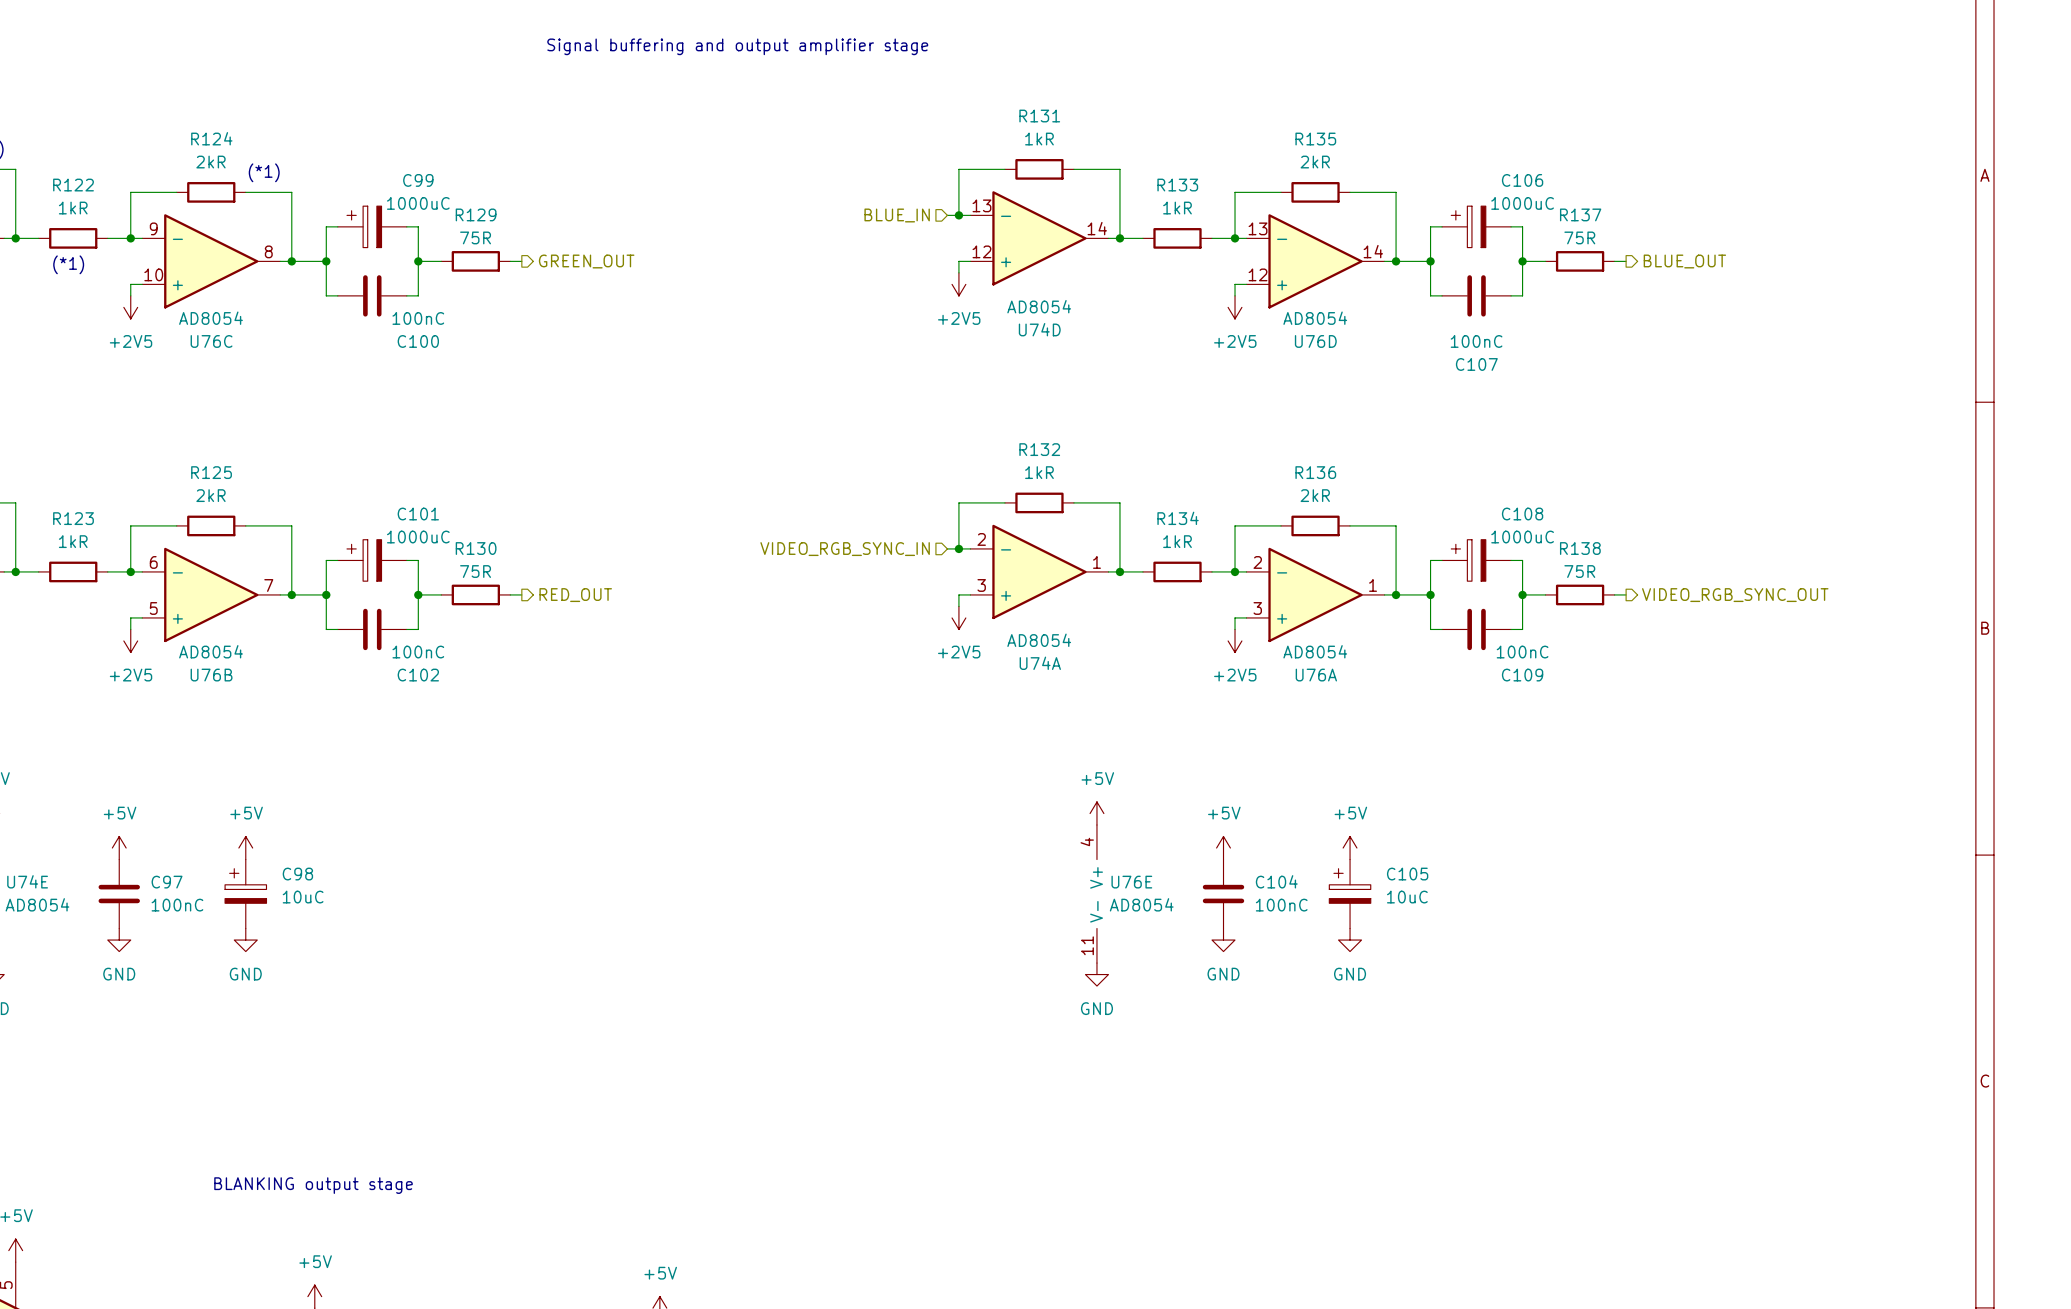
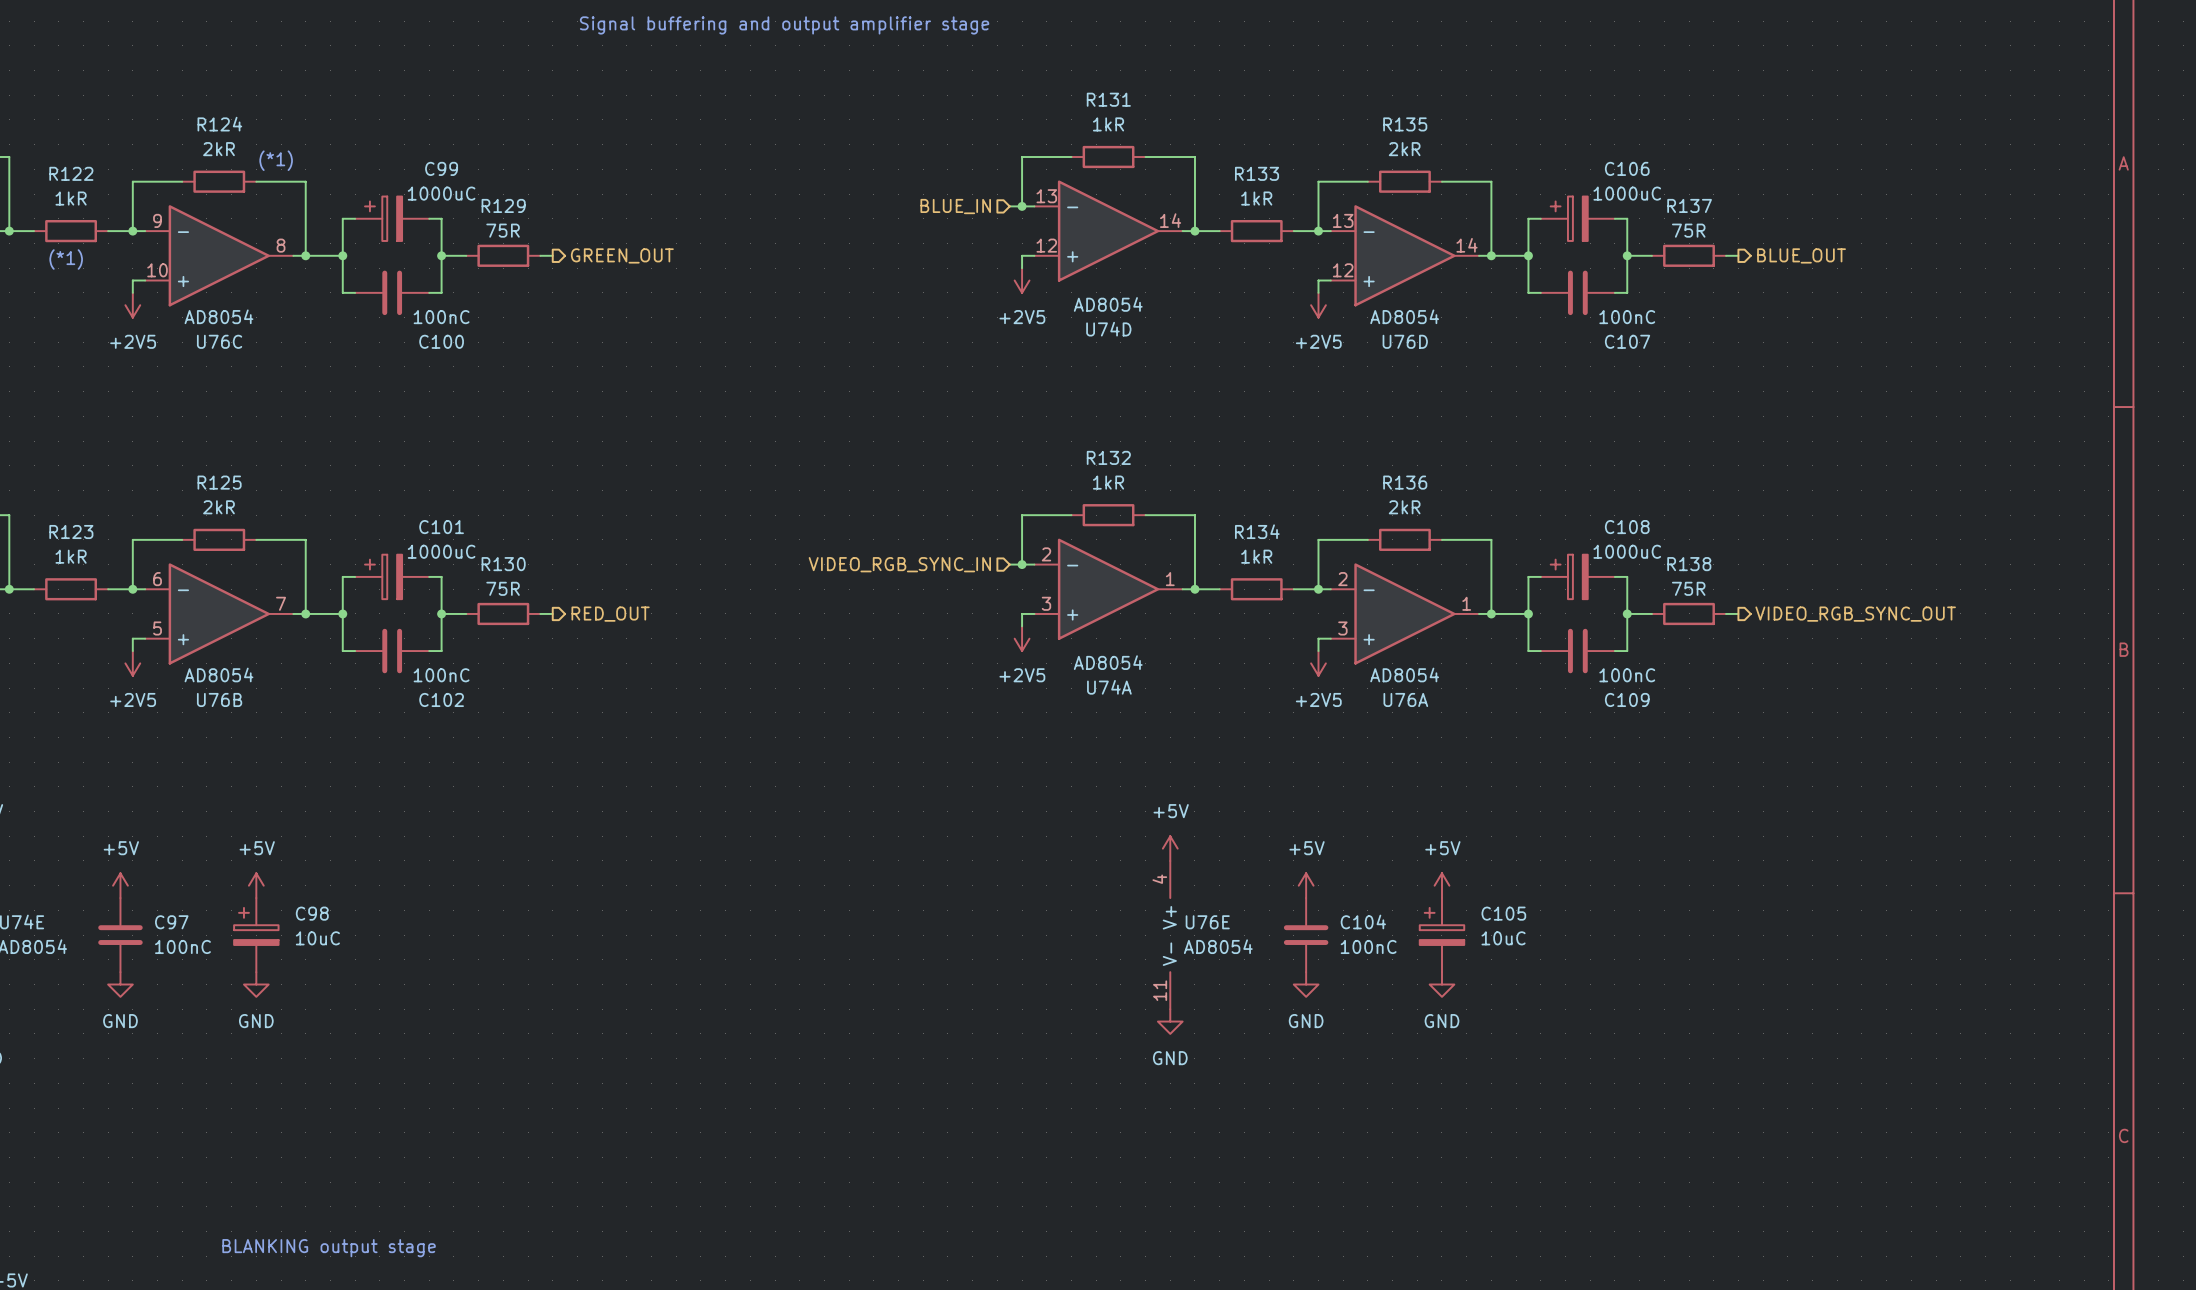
C107 value position: 100nC (1476, 341) -> 100nC (1627, 317)
C107 name position: C107 (1476, 364) -> C107 (1627, 341)

